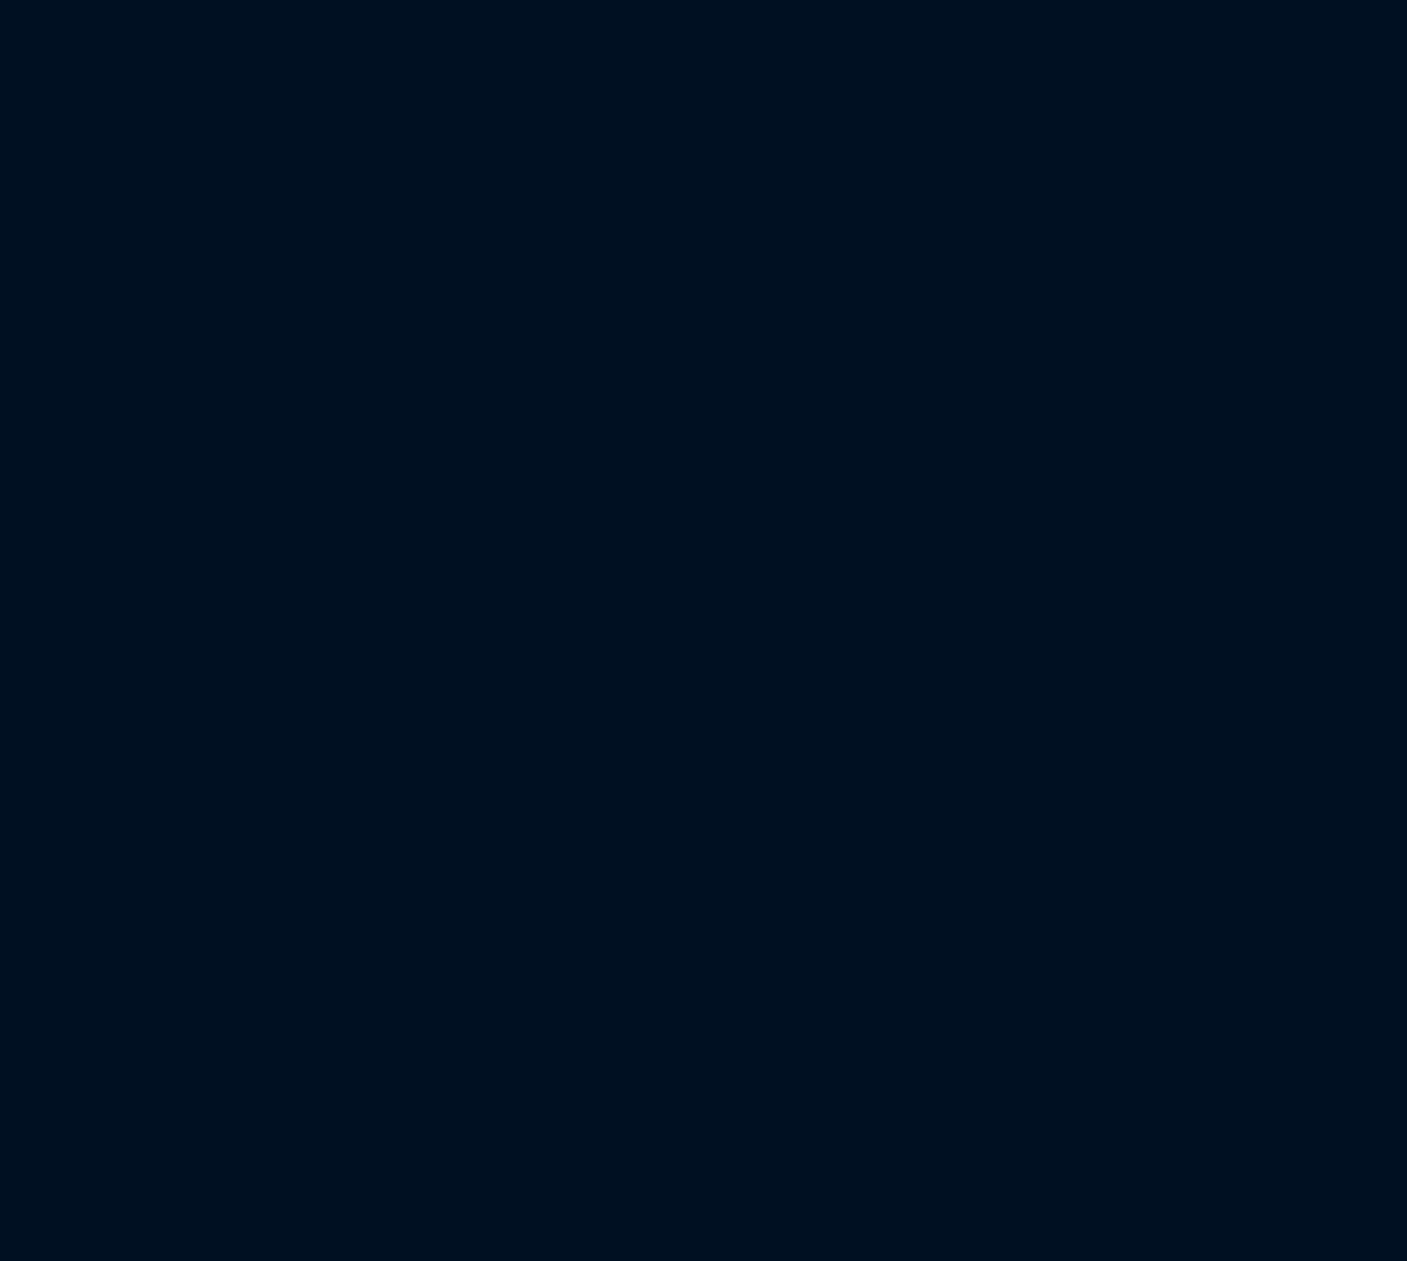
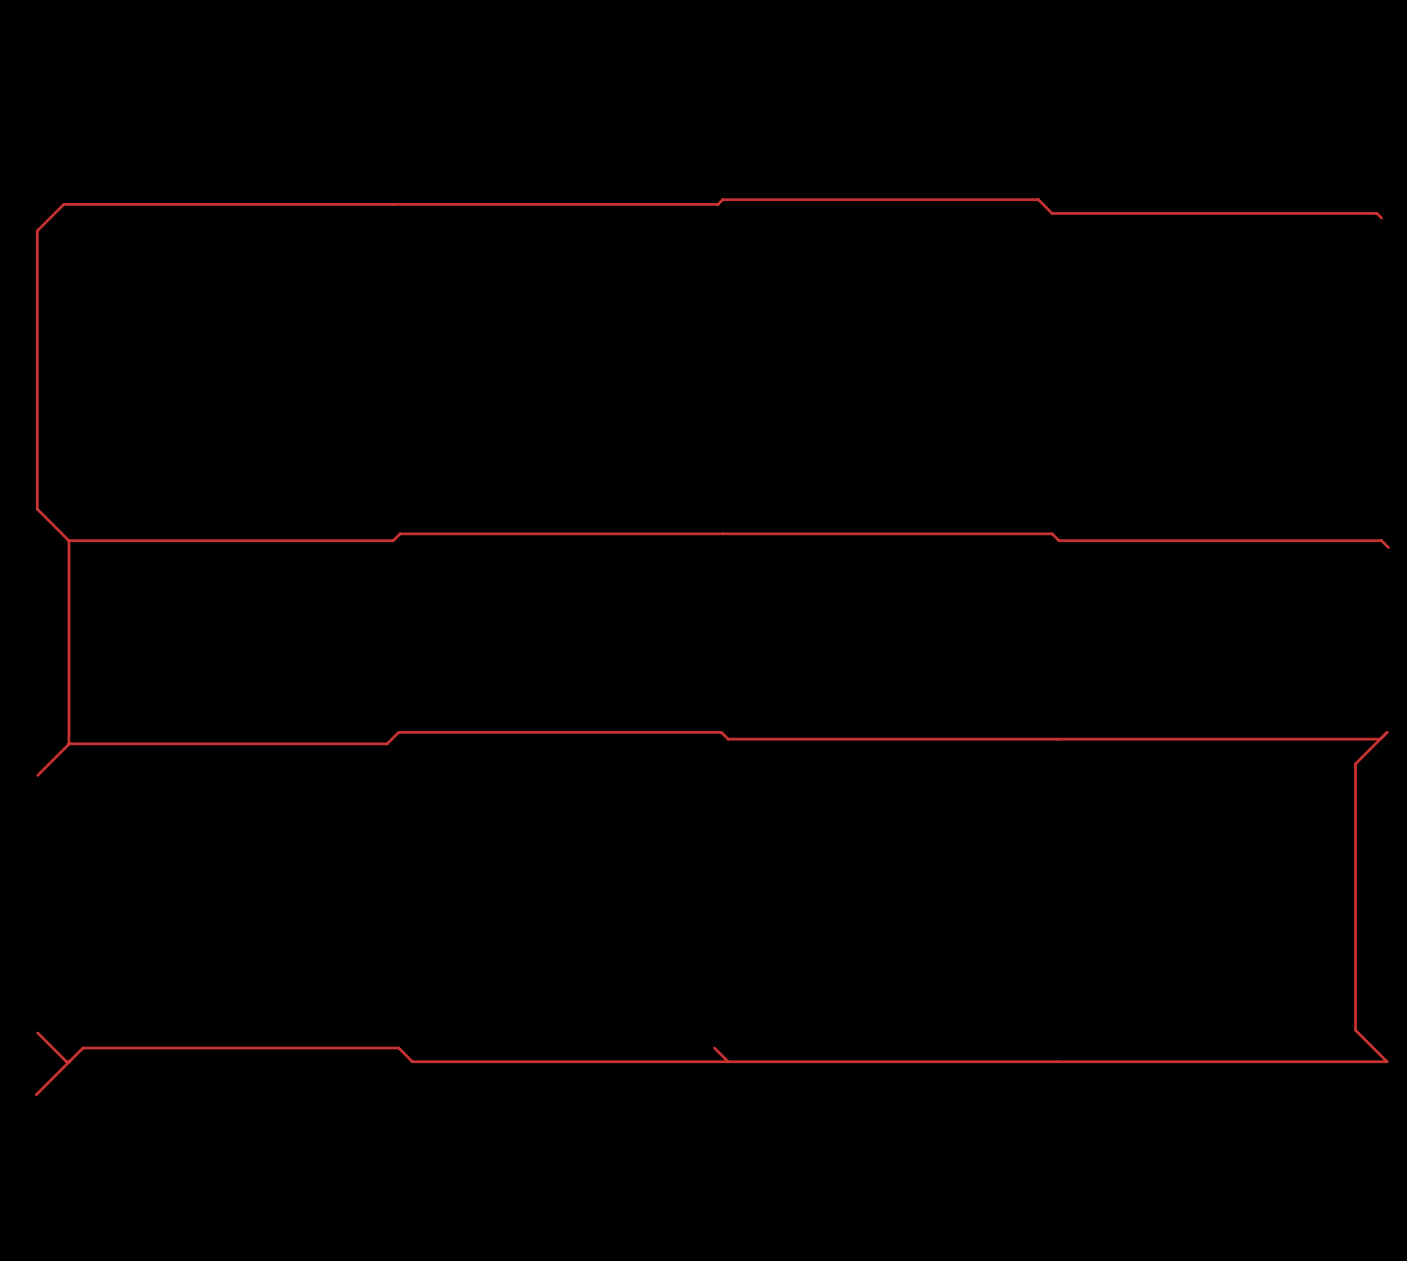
top track: none -> (1381, 218) (1376, 213) (1052, 213) (1038, 199) (722, 199) (717, 204) (63, 204) (37, 230) (37, 509) (68, 540)
top track: none -> (68, 540) (393, 540) (400, 533) (1052, 533) (1059, 540) (1381, 540) (1388, 547)
top track: none -> (68, 540) (69, 743)
top track: none -> (1387, 732) (1355, 763) (1355, 1030) (1387, 1061) (412, 1061) (398, 1048) (83, 1048) (36, 1094)
top track: none -> (1380, 739) (728, 739) (721, 732) (398, 732) (387, 743) (69, 743)
top track: none -> (69, 743) (37, 775)
top track: none -> (37, 1032) (66, 1061) (69, 1061)
top track: none -> (714, 1048) (728, 1061)

